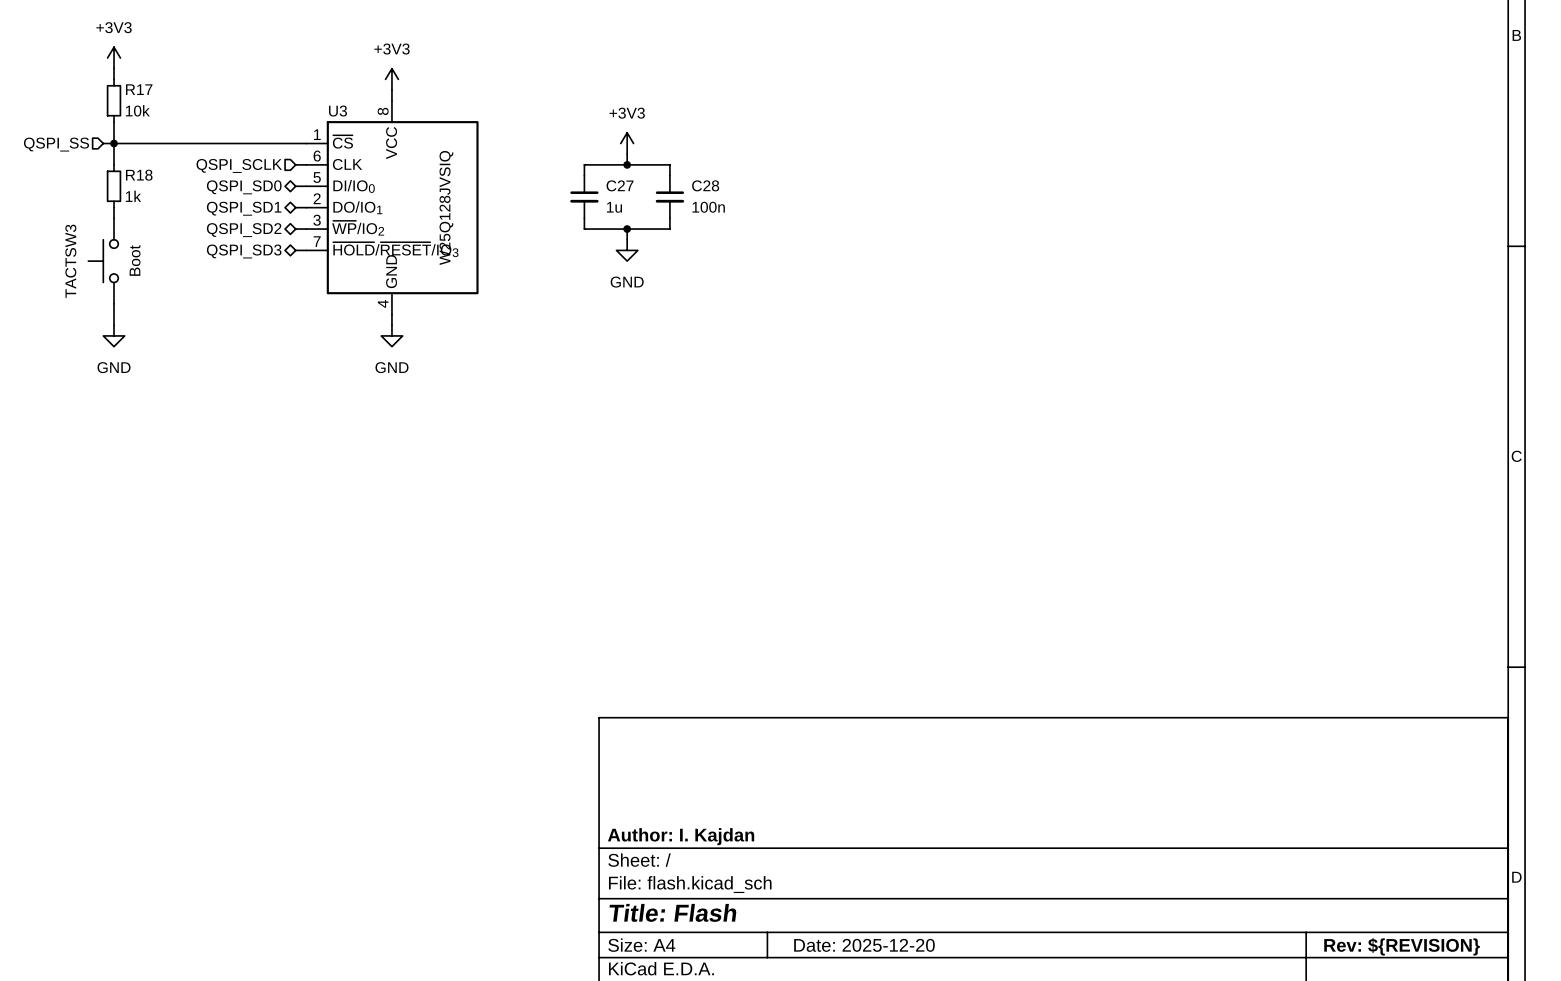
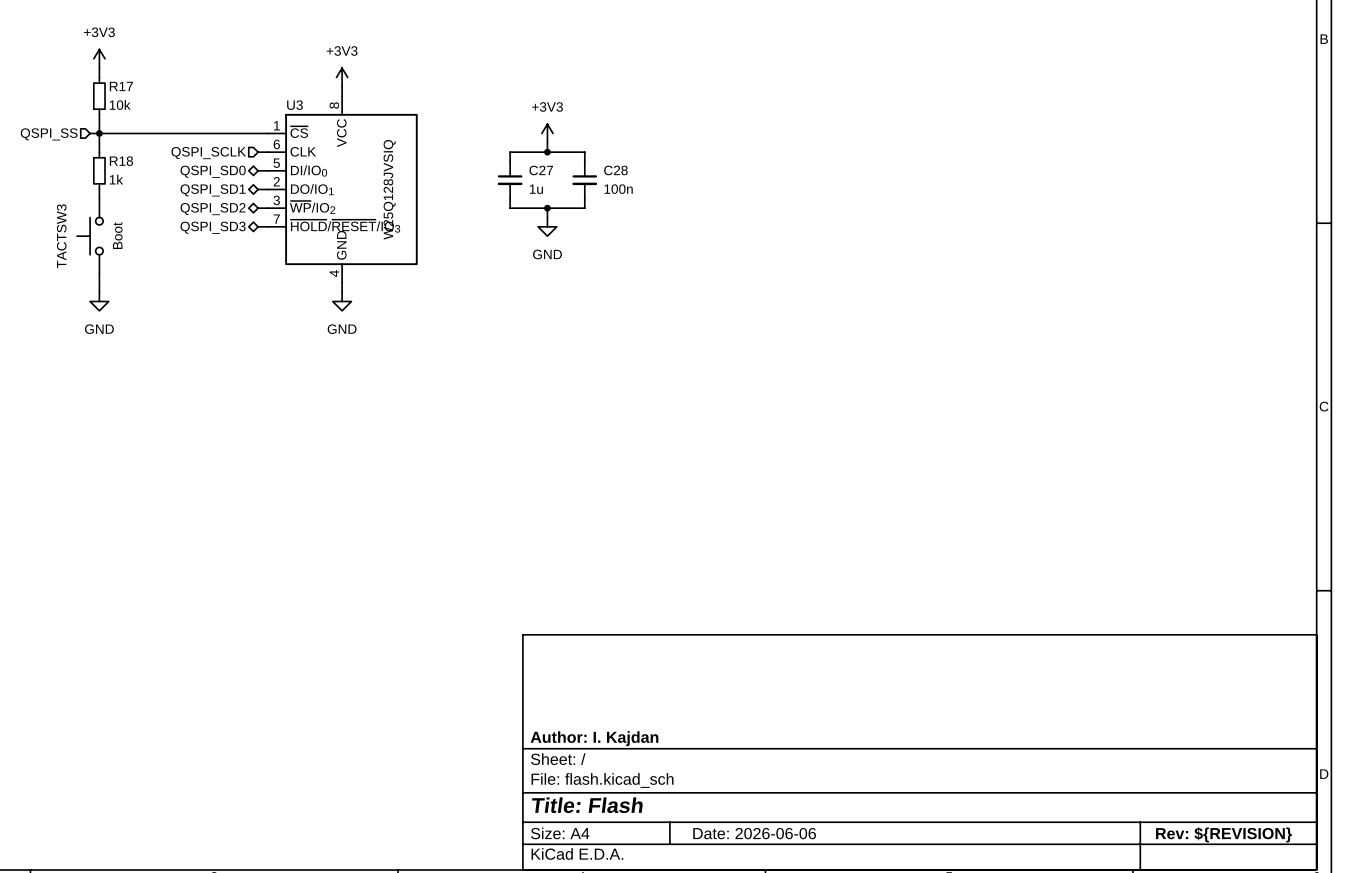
title block: Date: 2025-12-20 (864, 945) -> Date: 2026-06-06 (754, 833)

